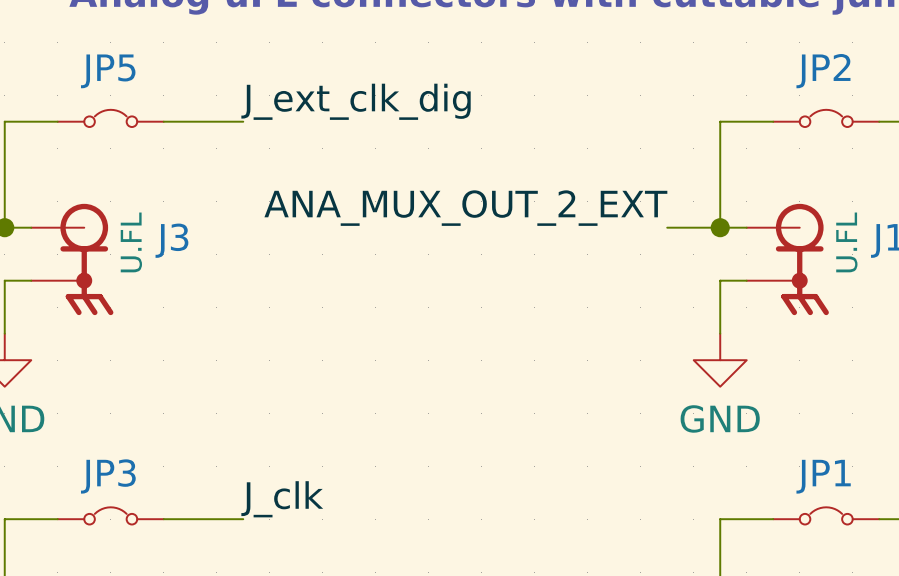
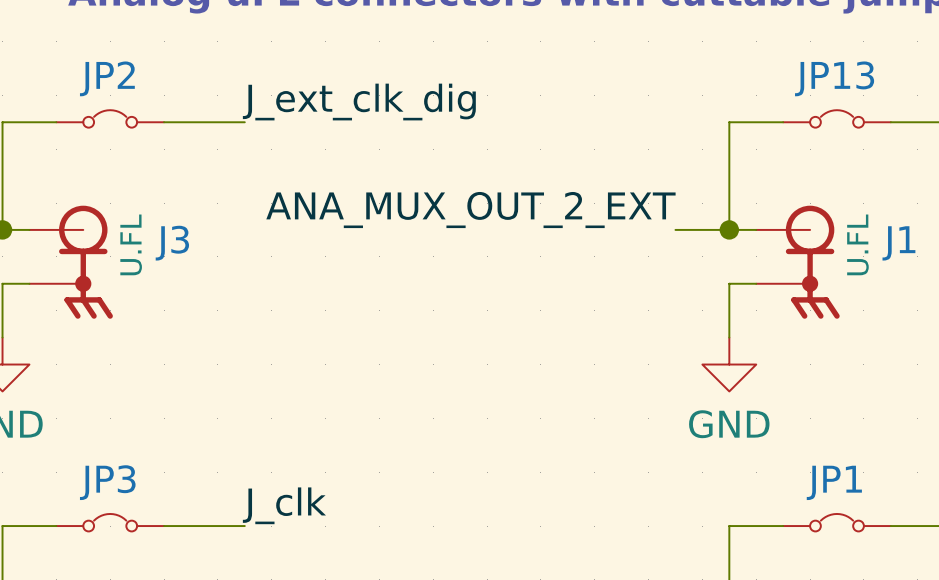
JP5 name: JP5 (108, 71) -> JP2 (107, 78)
JP2 name: JP2 (823, 71) -> JP13 (834, 78)

